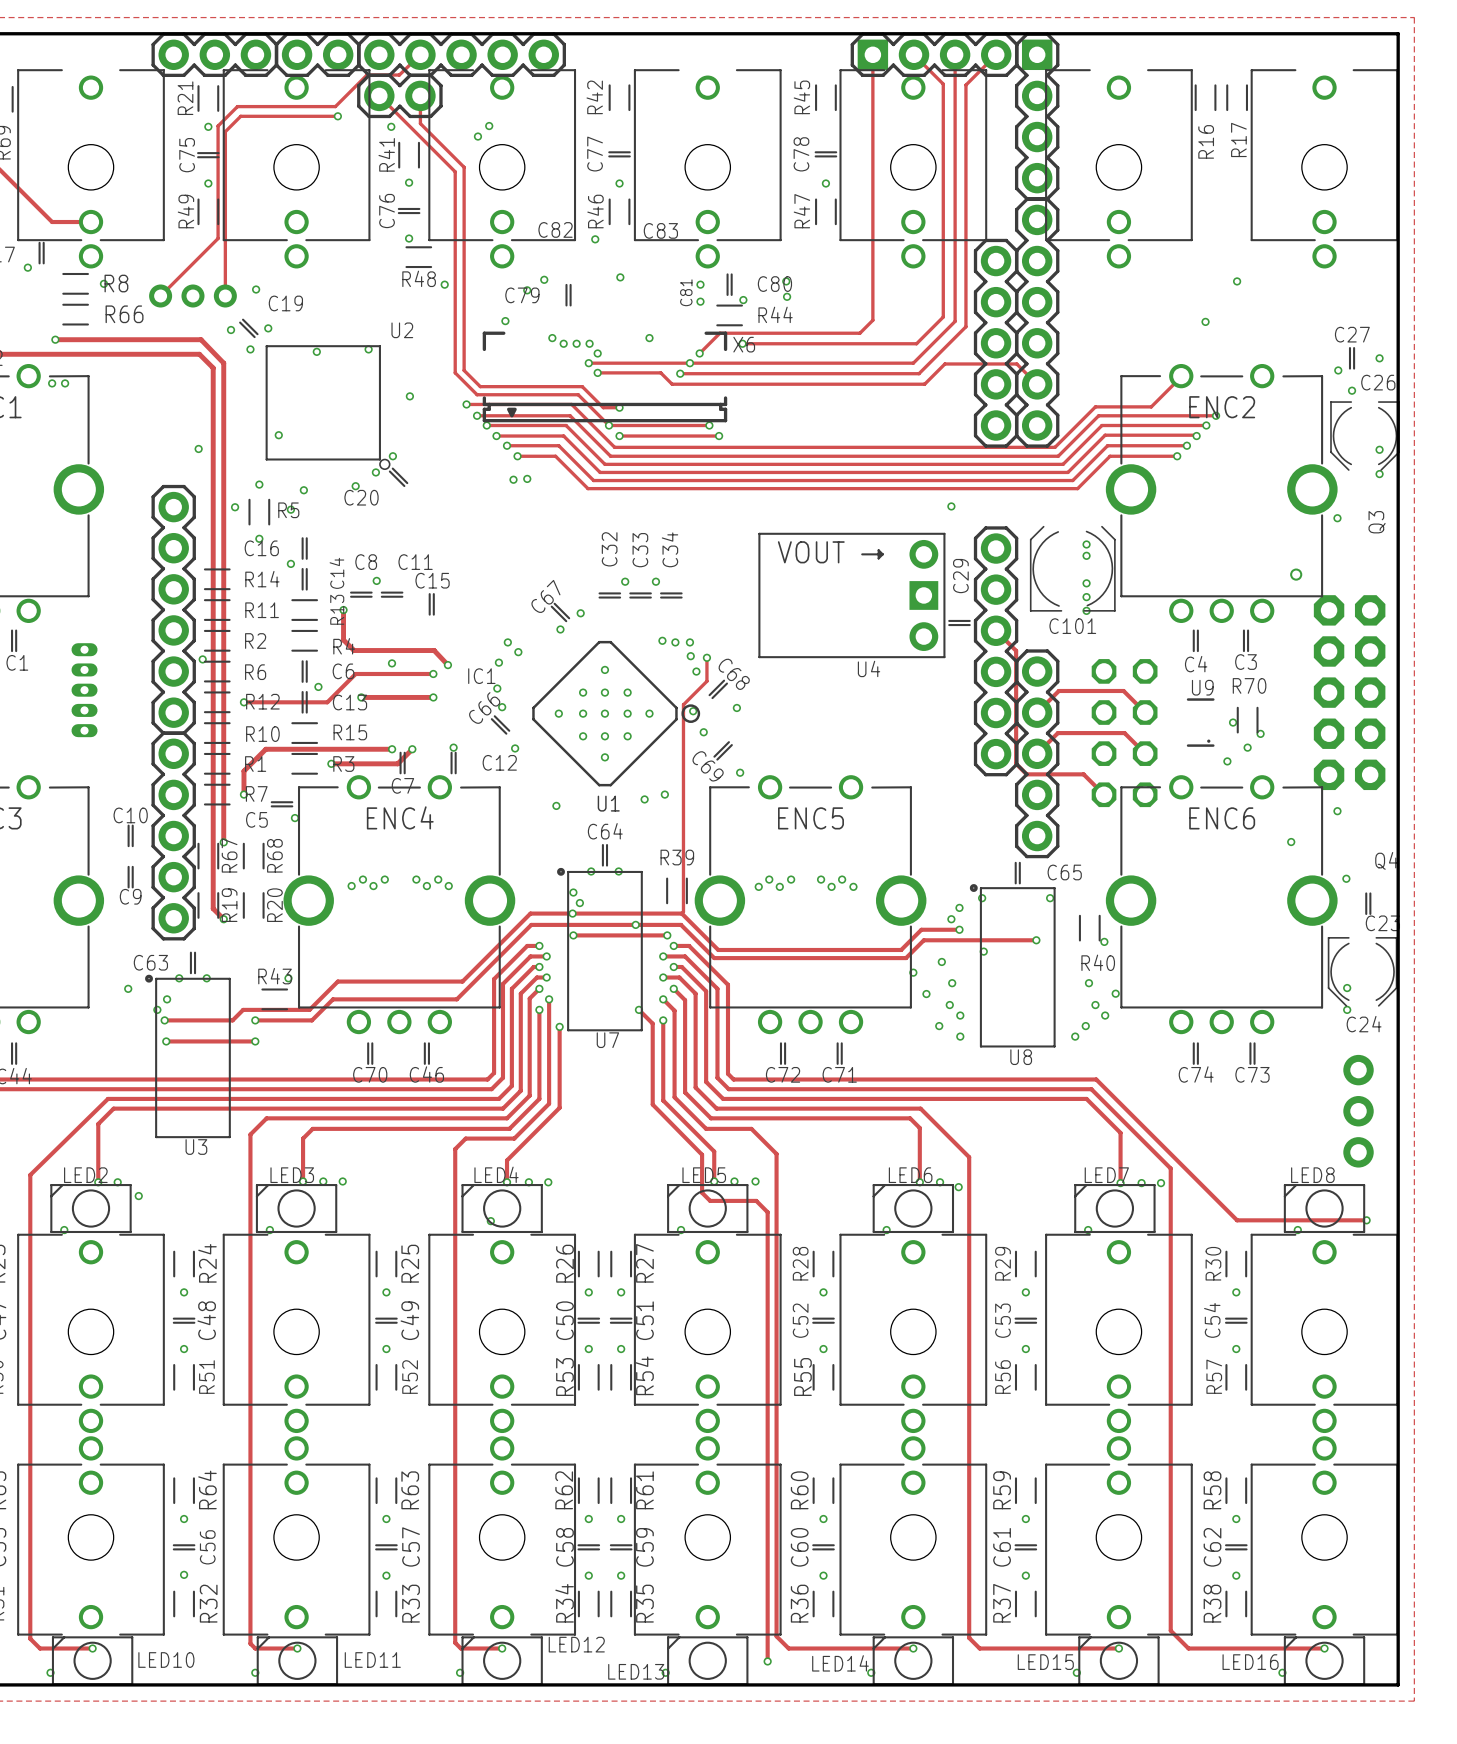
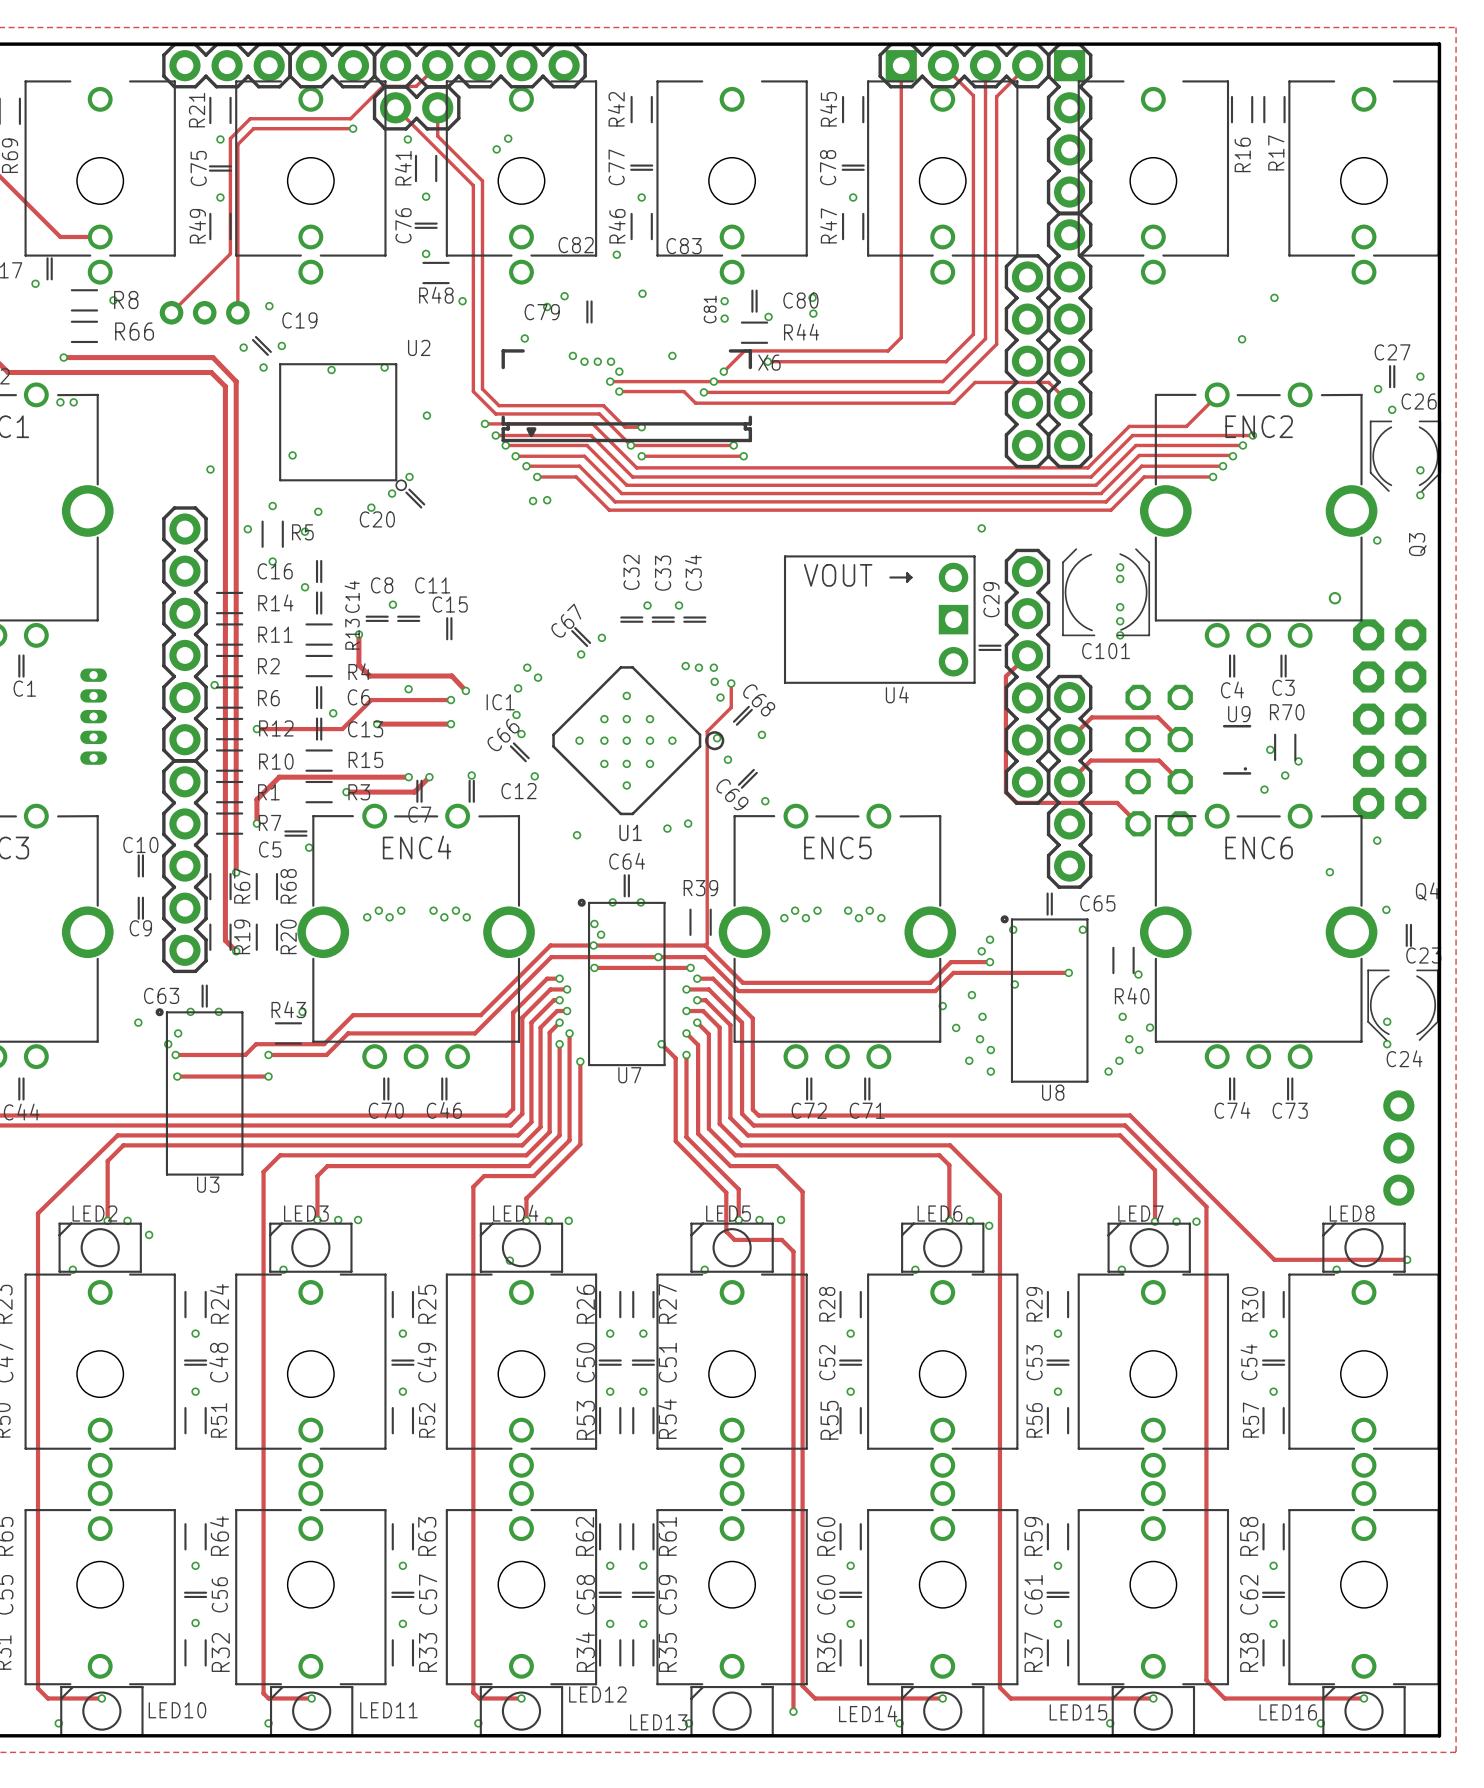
track: (996, 630) (1016, 650) (1016, 763) (1026, 774) -> (1027, 655) (1005, 676) (1005, 792) (1016, 802) (1058, 802)

